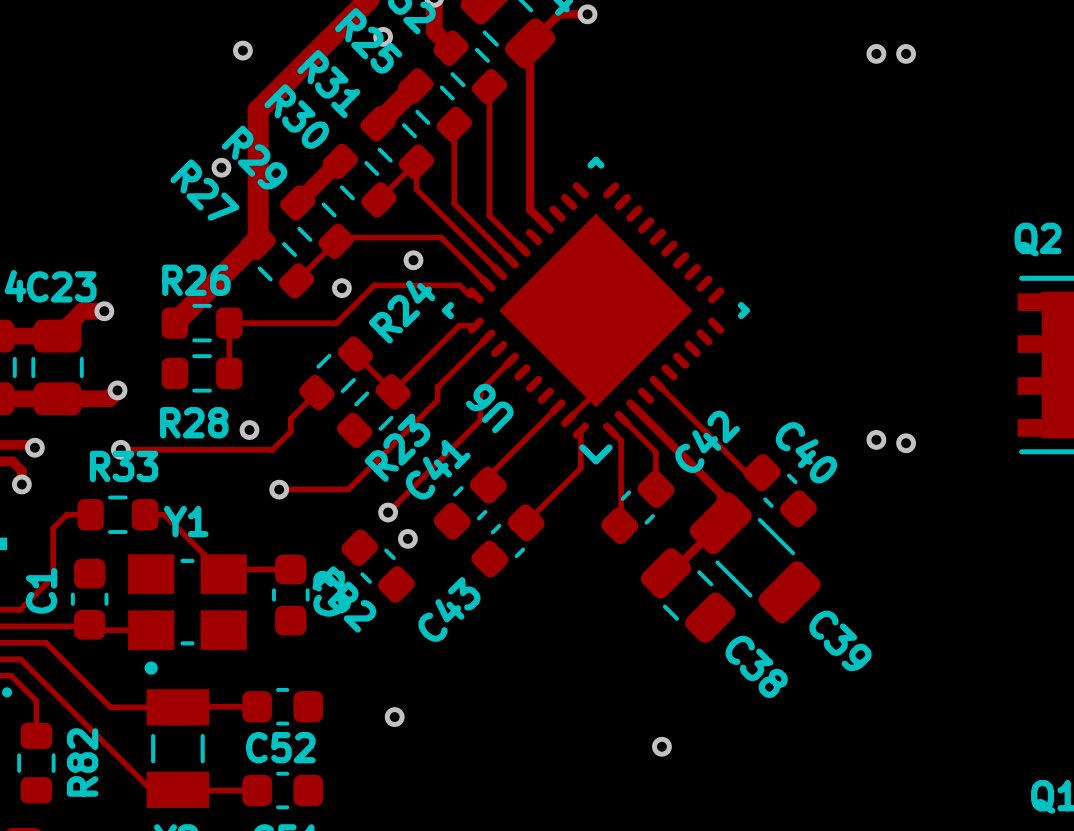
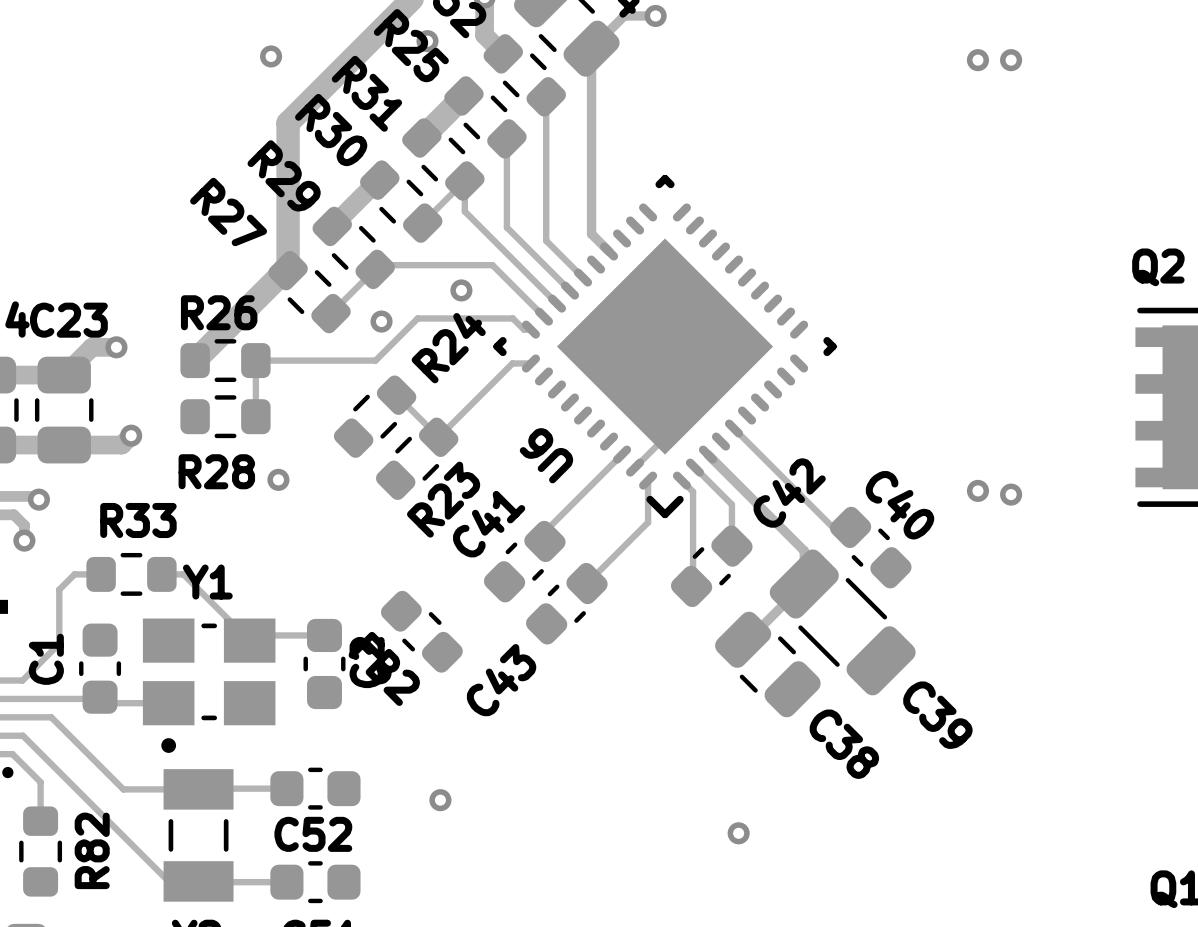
via: (221, 167) -> none
track: (487, 337) (437, 387) (437, 400) (348, 489) (279, 489) -> none
track: (510, 360) (480, 391) (480, 420) (388, 512) -> none
track: (316, 392) (290, 418) (290, 431) (272, 449) (120, 449) -> none
via: (120, 449) -> none
via: (279, 489) -> none
via: (388, 512) -> none
via: (407, 538) -> none

